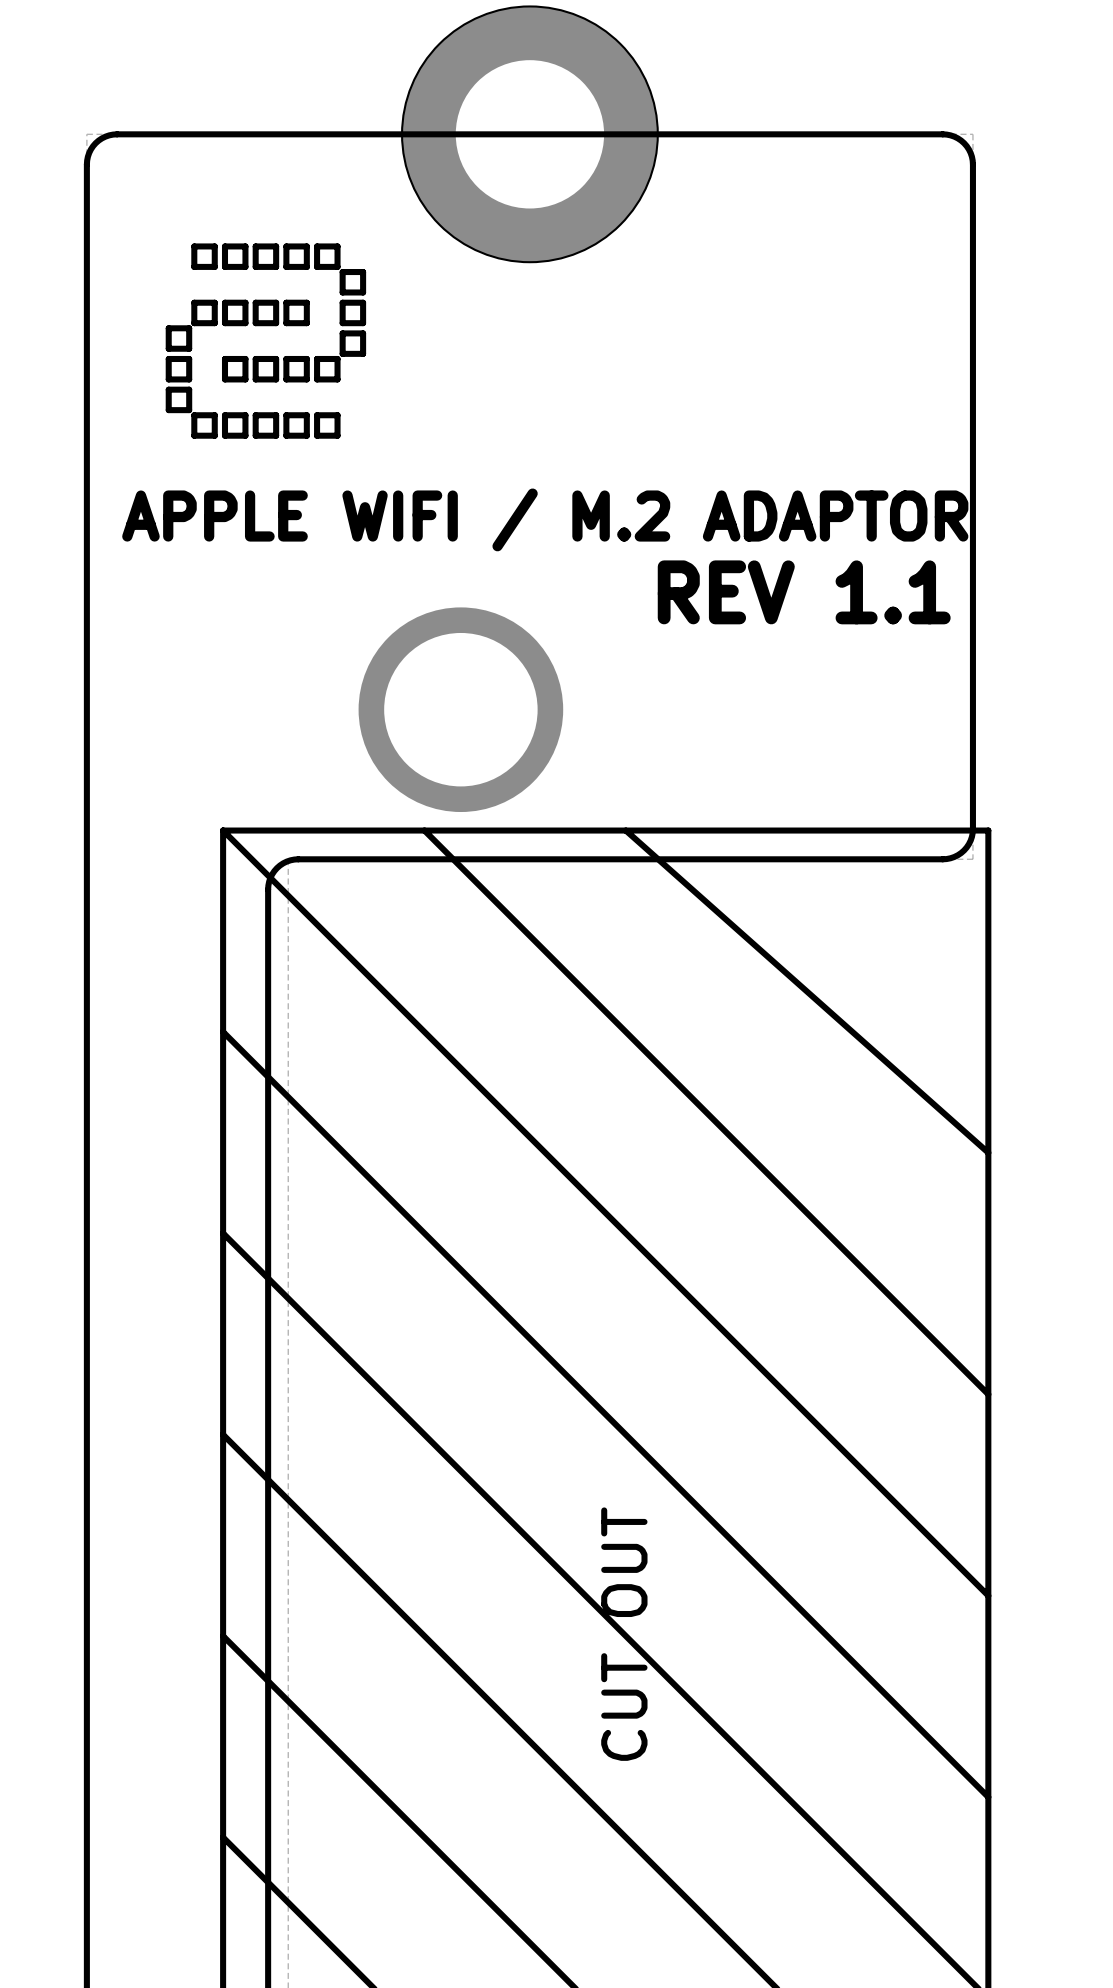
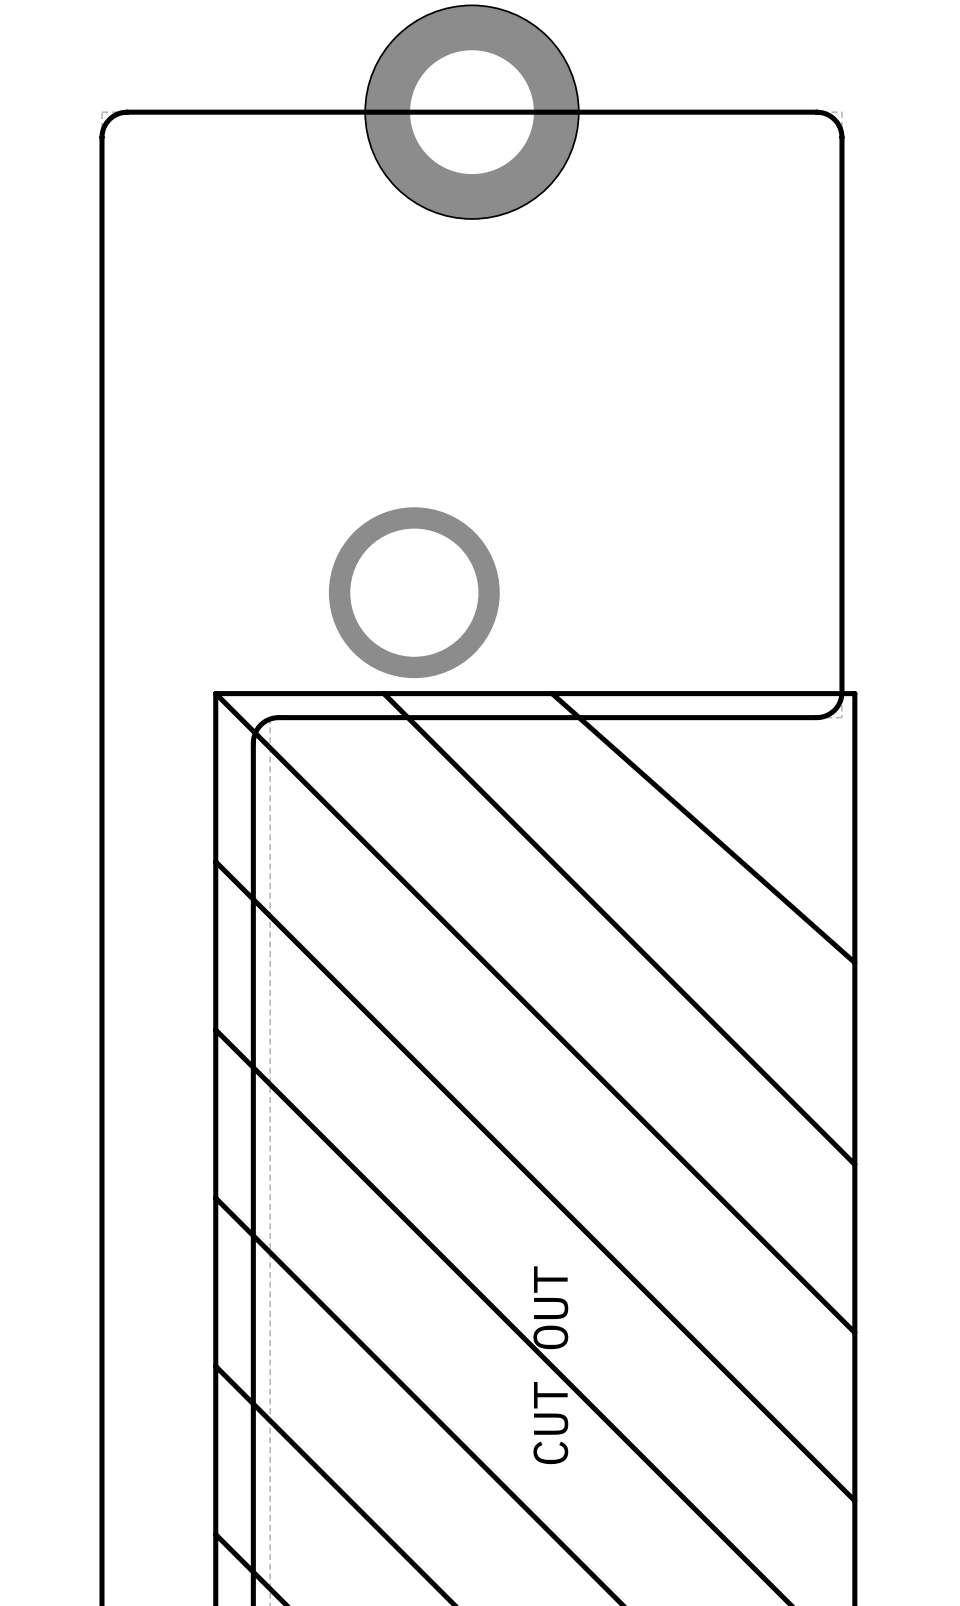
drawing: [165, 243, 367, 439] -> none
text: APPLE WIFI / M.2 ADAPTOR (545, 519) -> none
text: REV 1.1 (804, 592) -> none

